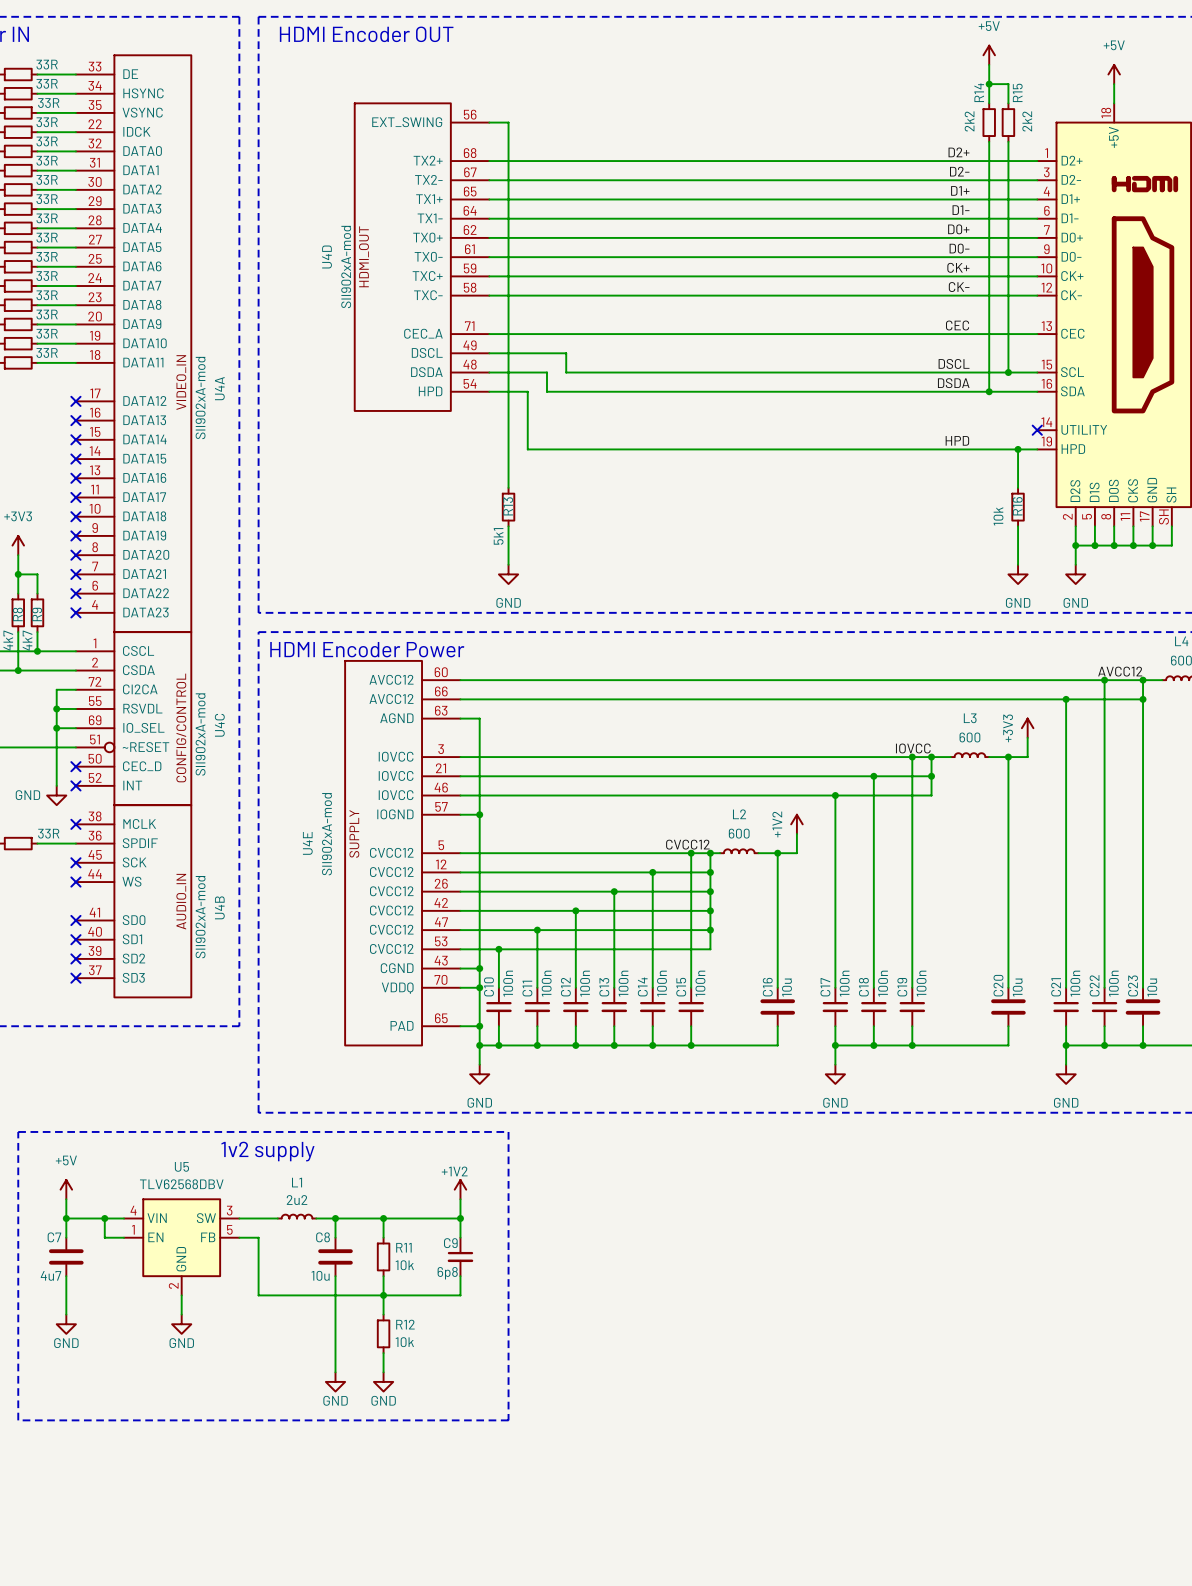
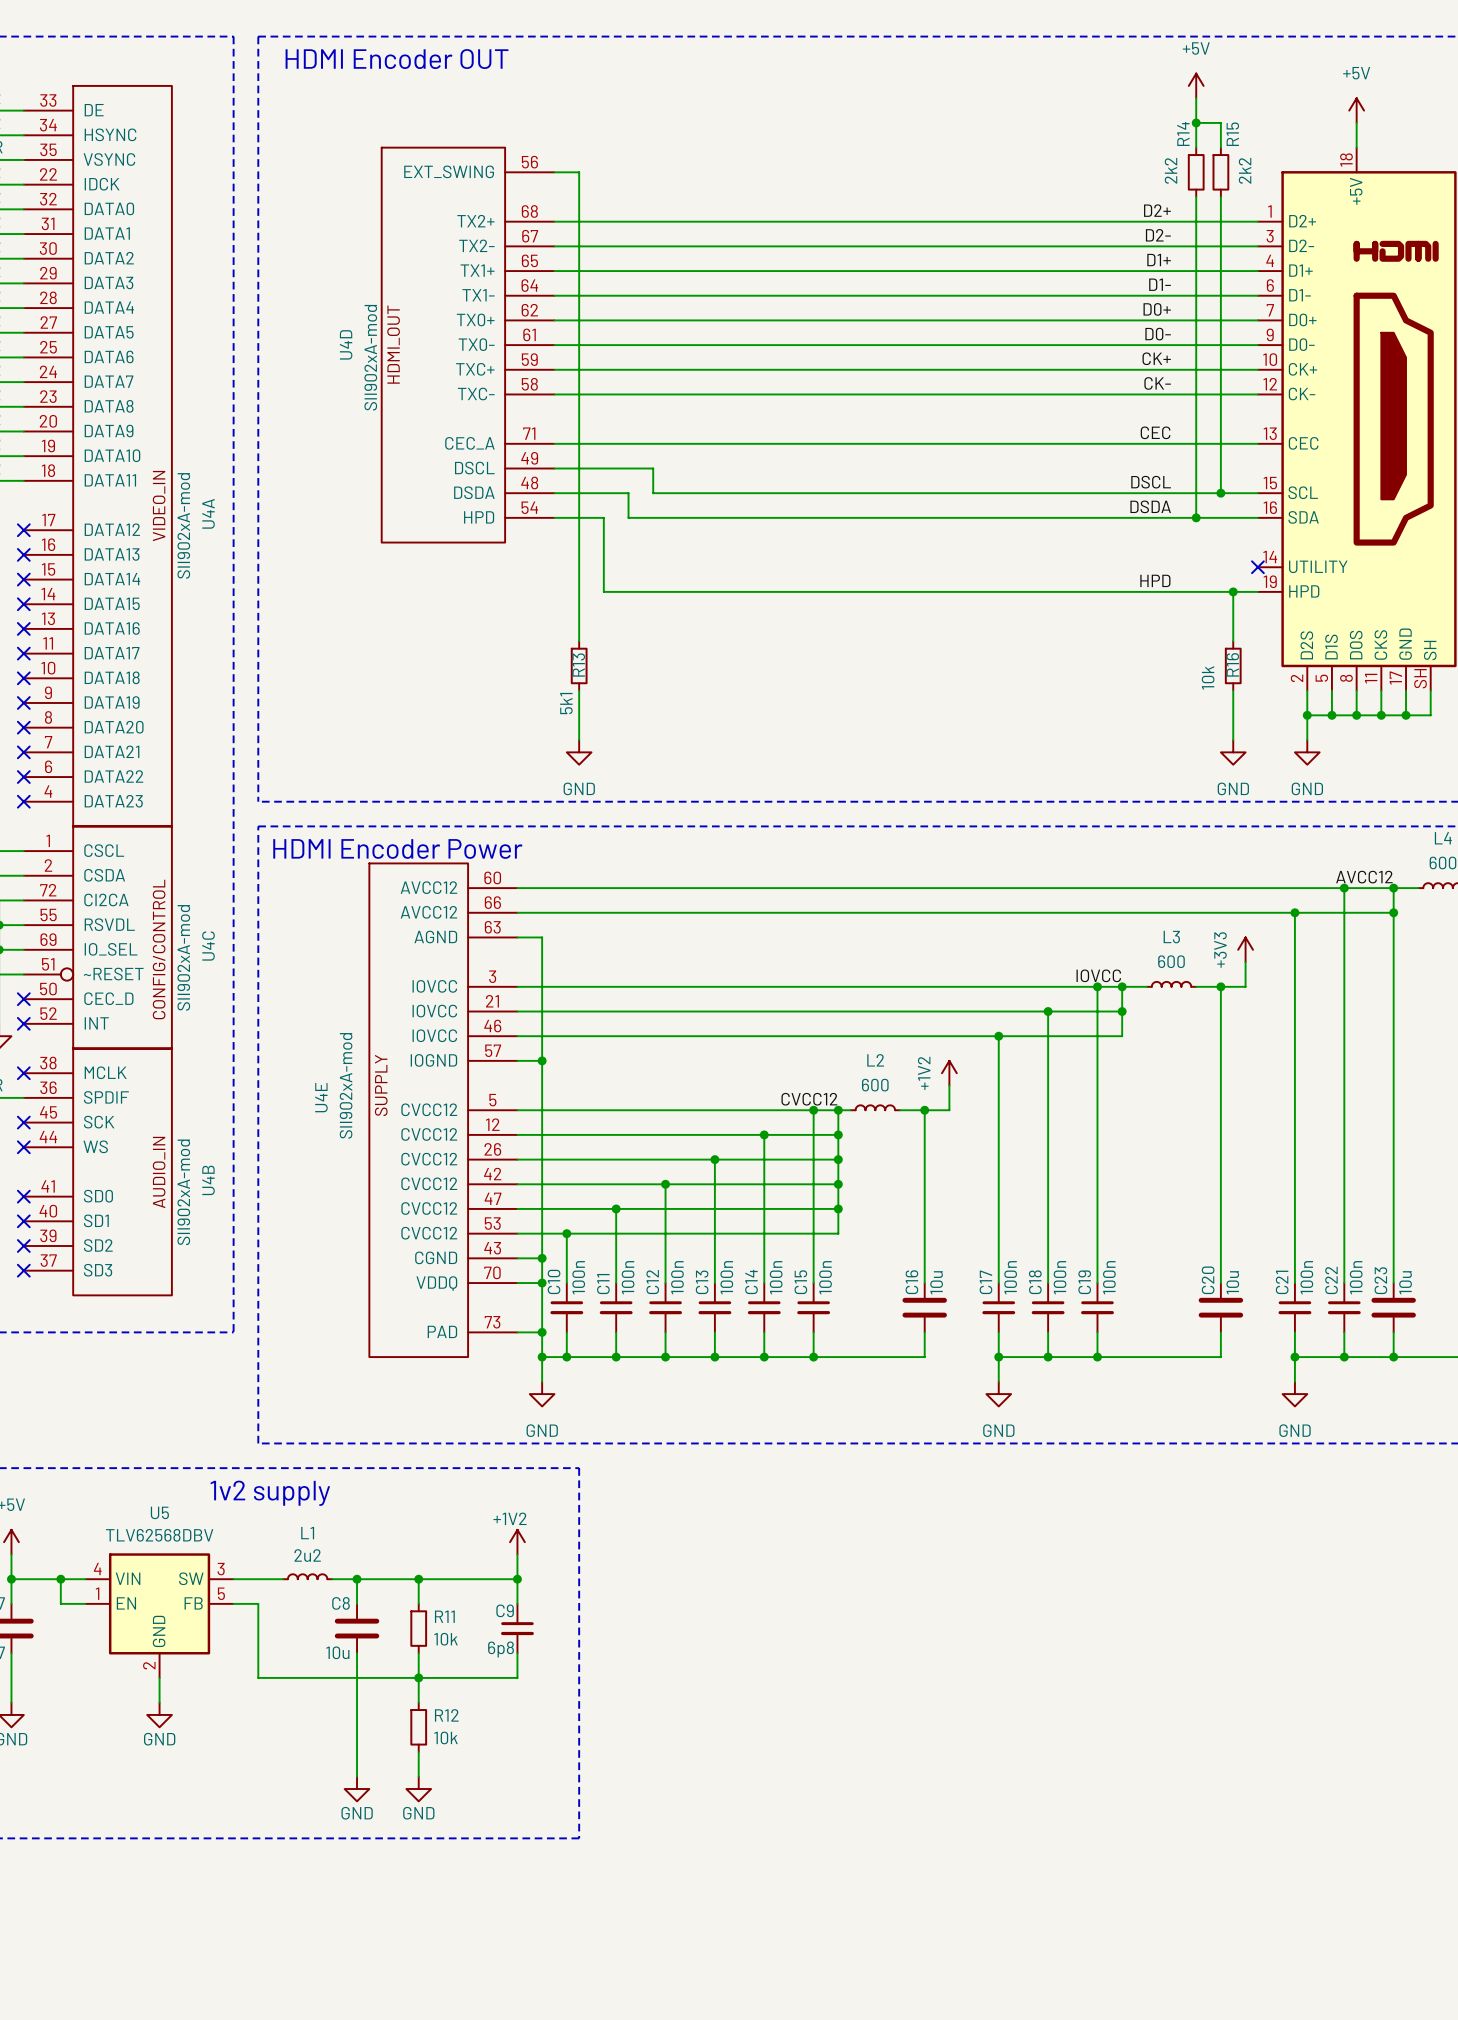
U4E pin number: 65 (441, 1018) -> 73 (492, 1322)

